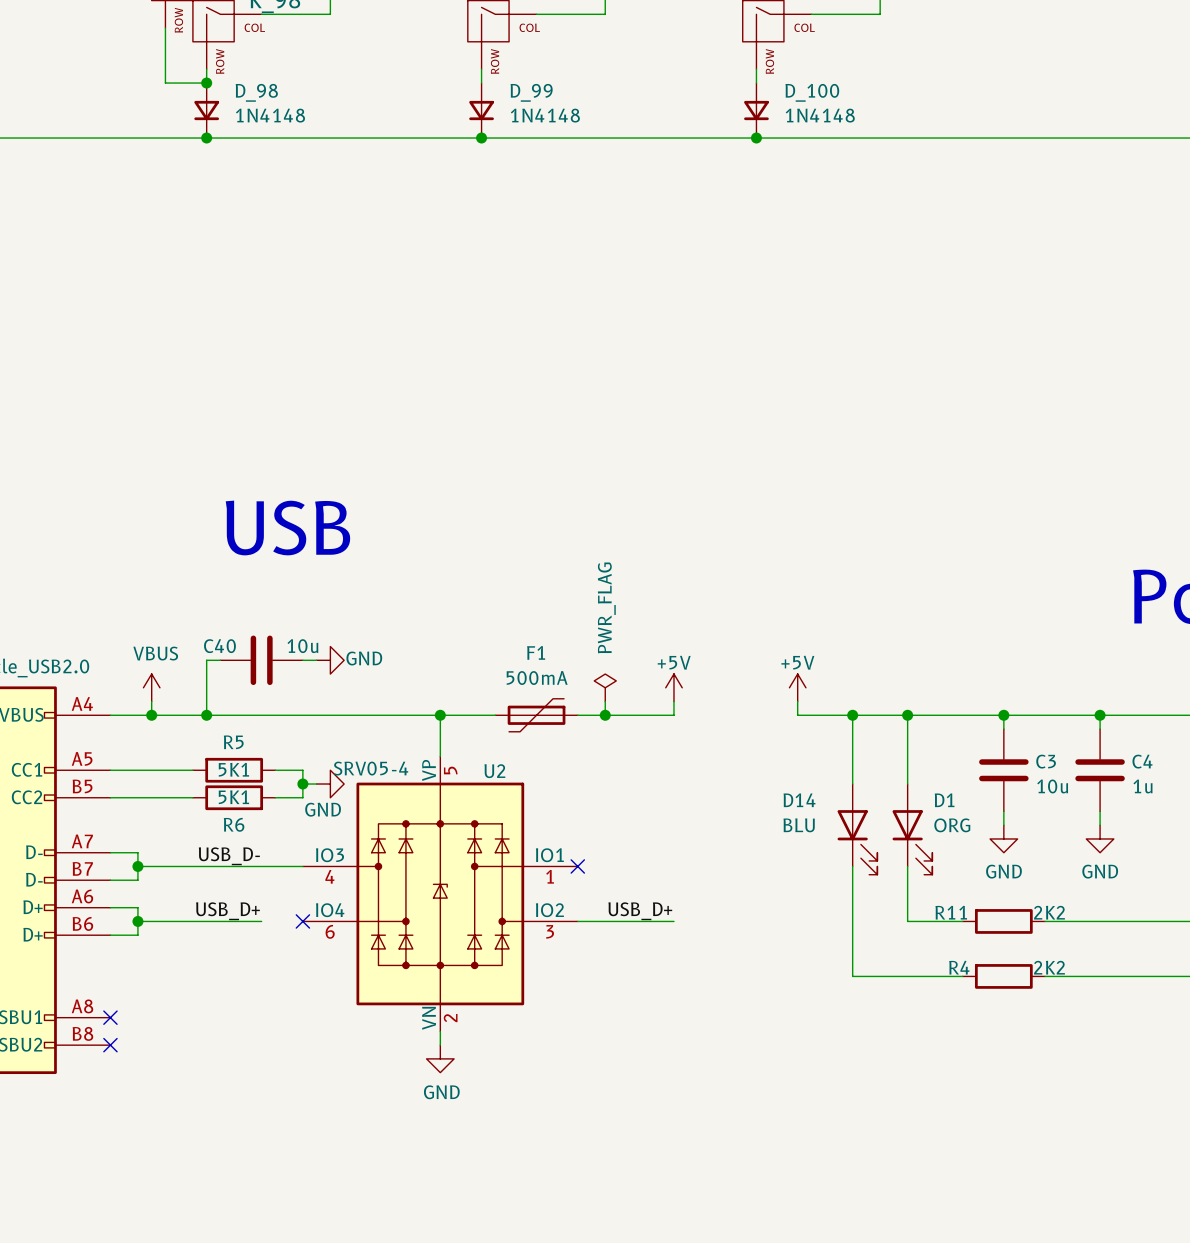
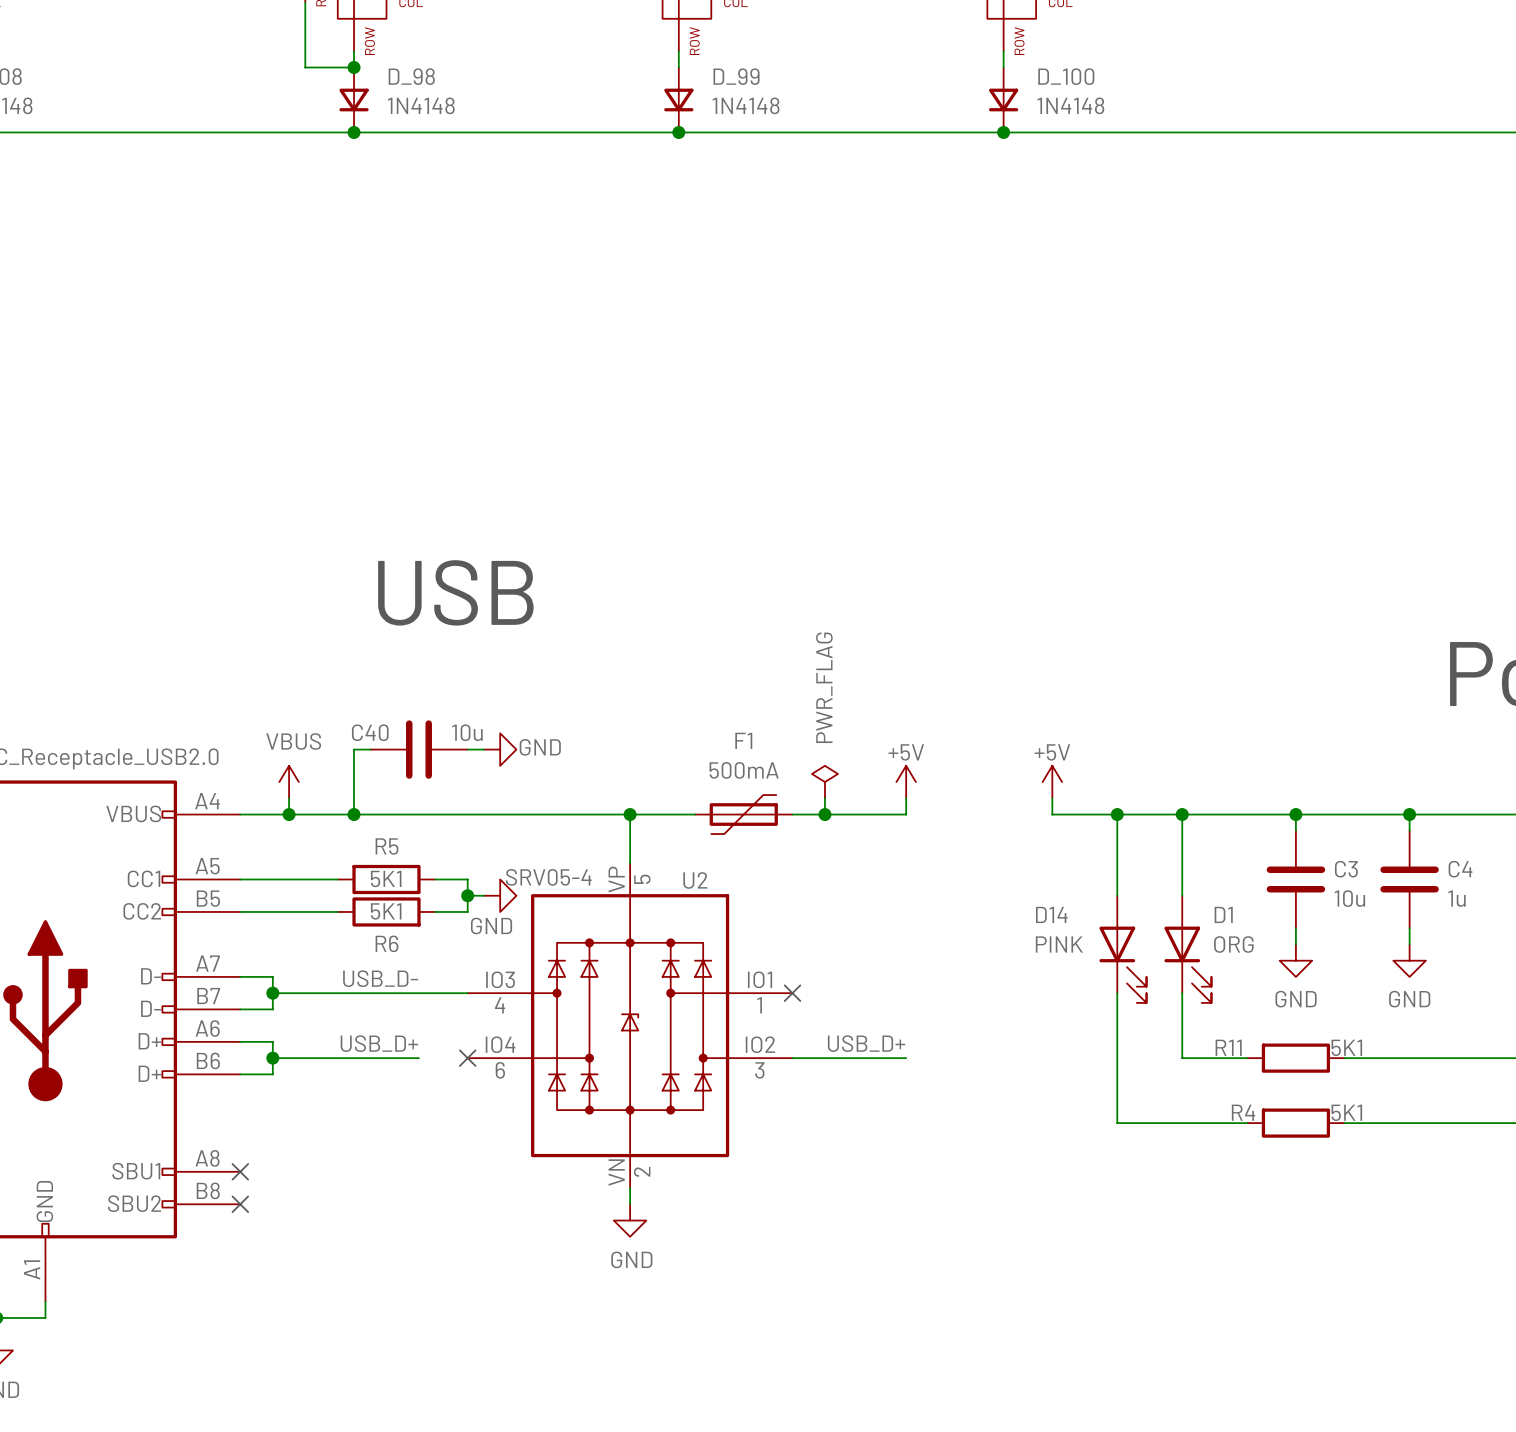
D14 value: BLU (799, 825) -> PINK (1059, 944)
R11 value: 2K2 (1049, 912) -> 5K1 (1346, 1047)
R4 value: 2K2 (1049, 967) -> 5K1 (1346, 1112)

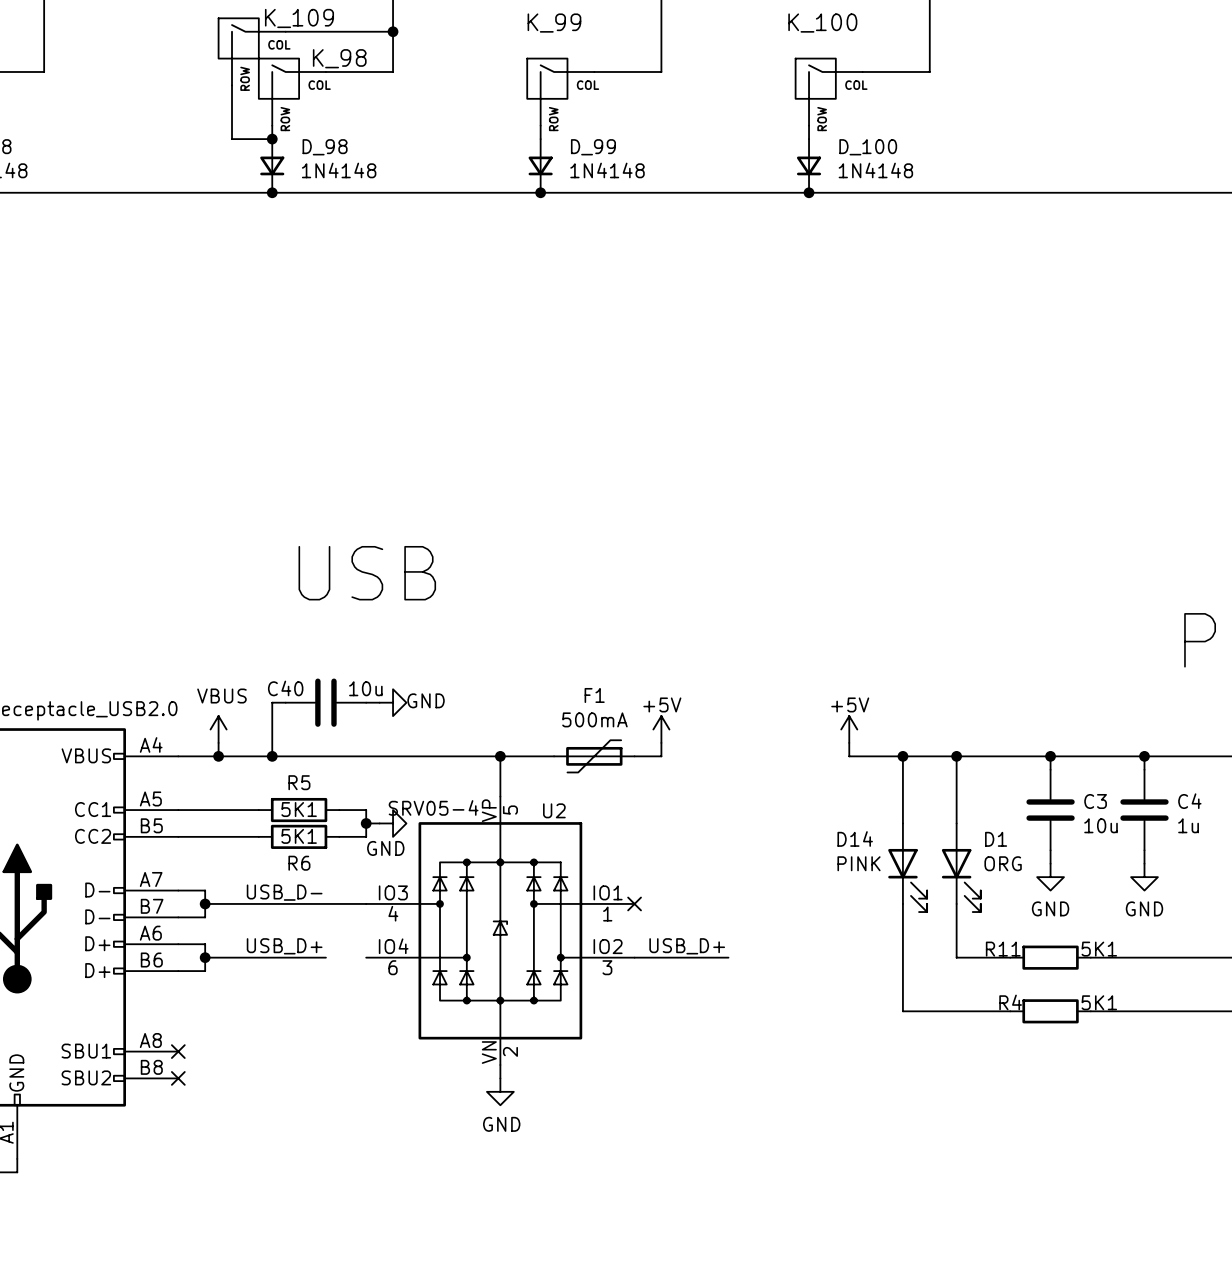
power symbol: PWR_FLAG (824, 782) -> +5V (661, 729)
power symbol: +5V (906, 782) -> none
wire: (906, 798) (906, 814) (824, 814) -> none
junction: (824, 814) -> none
no-connect mark: (467, 1058) -> none

